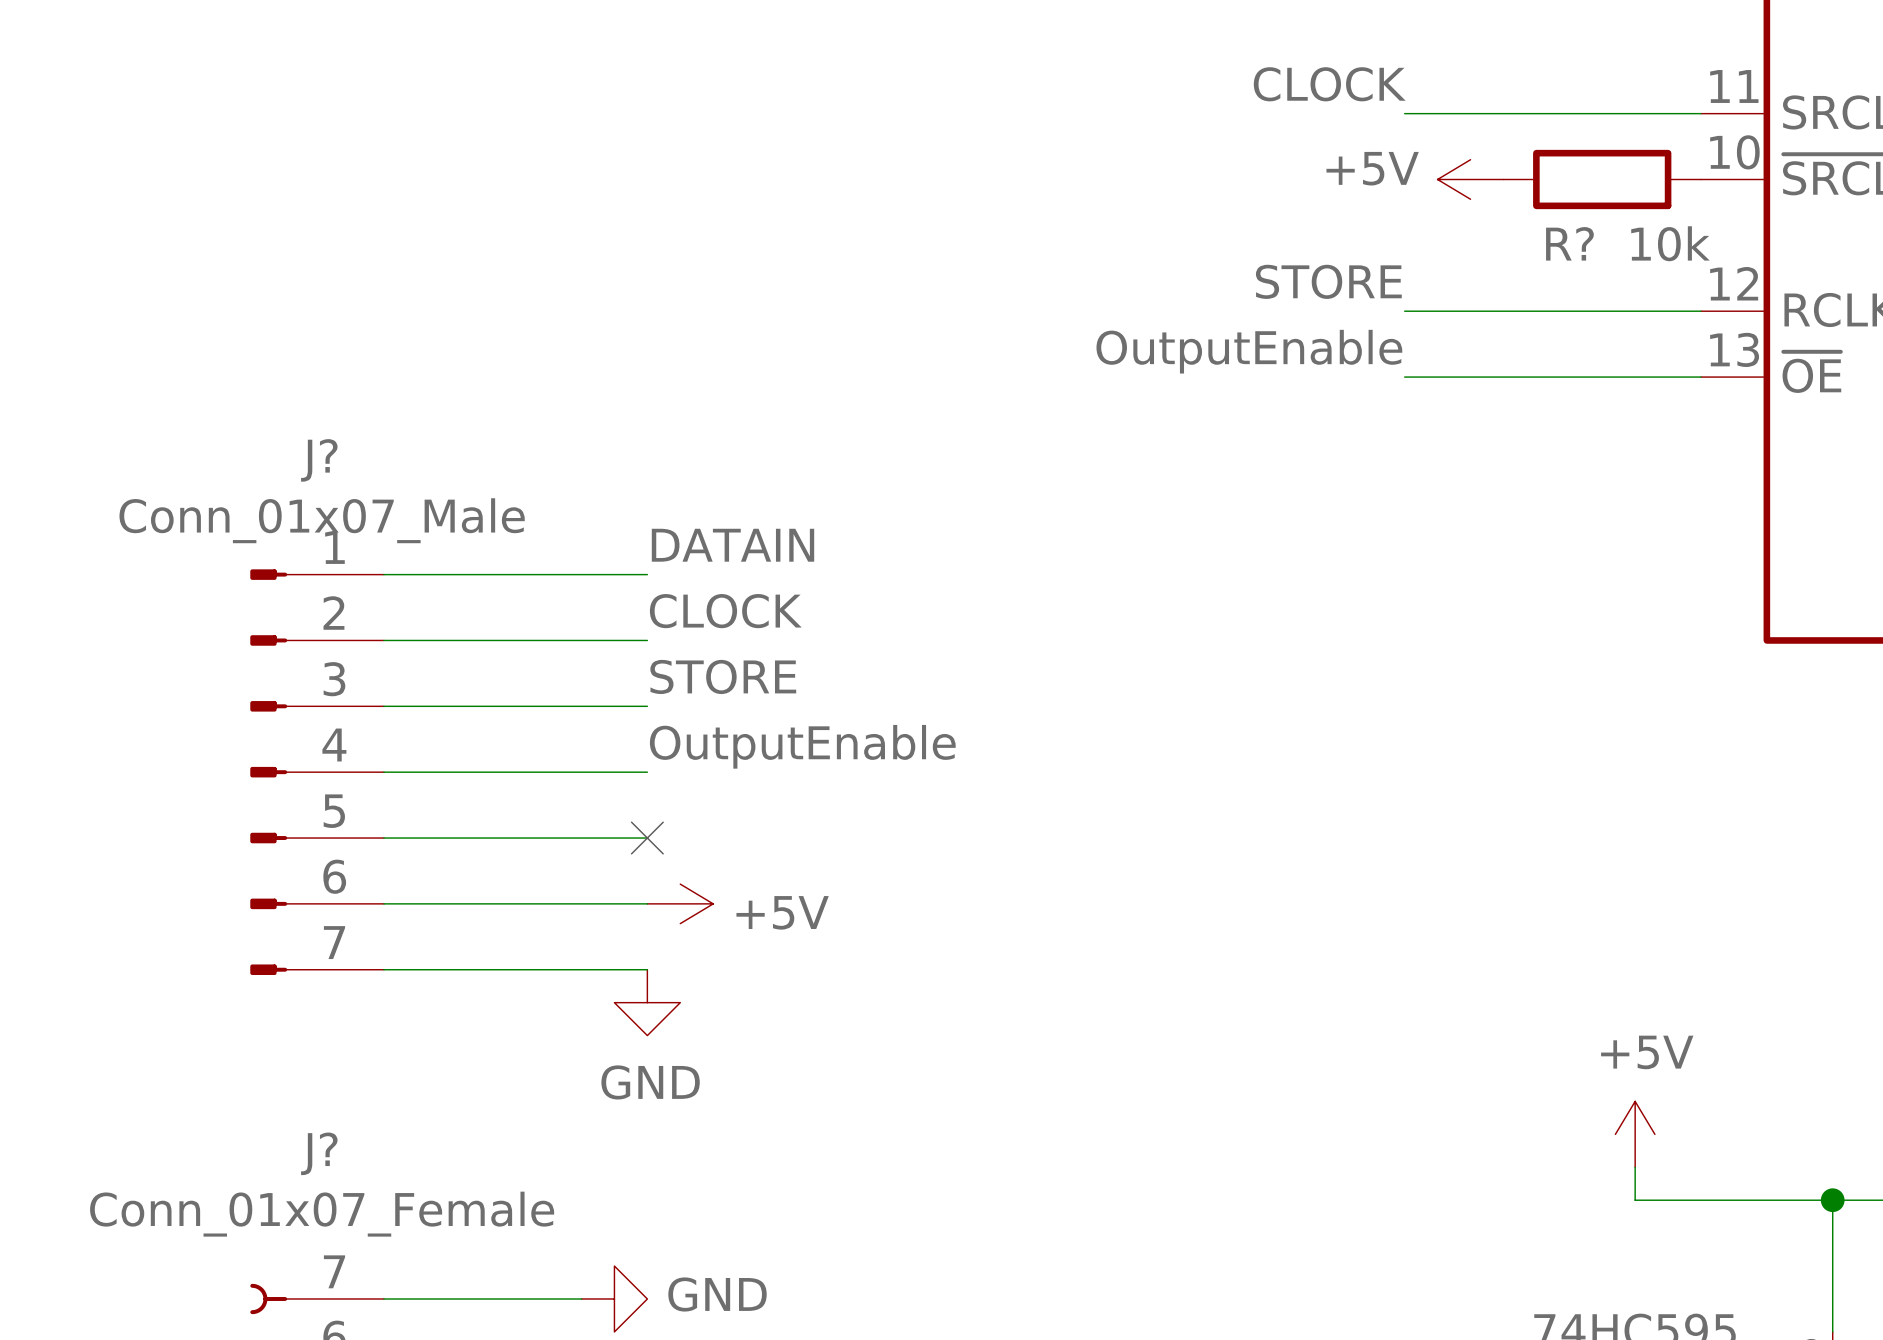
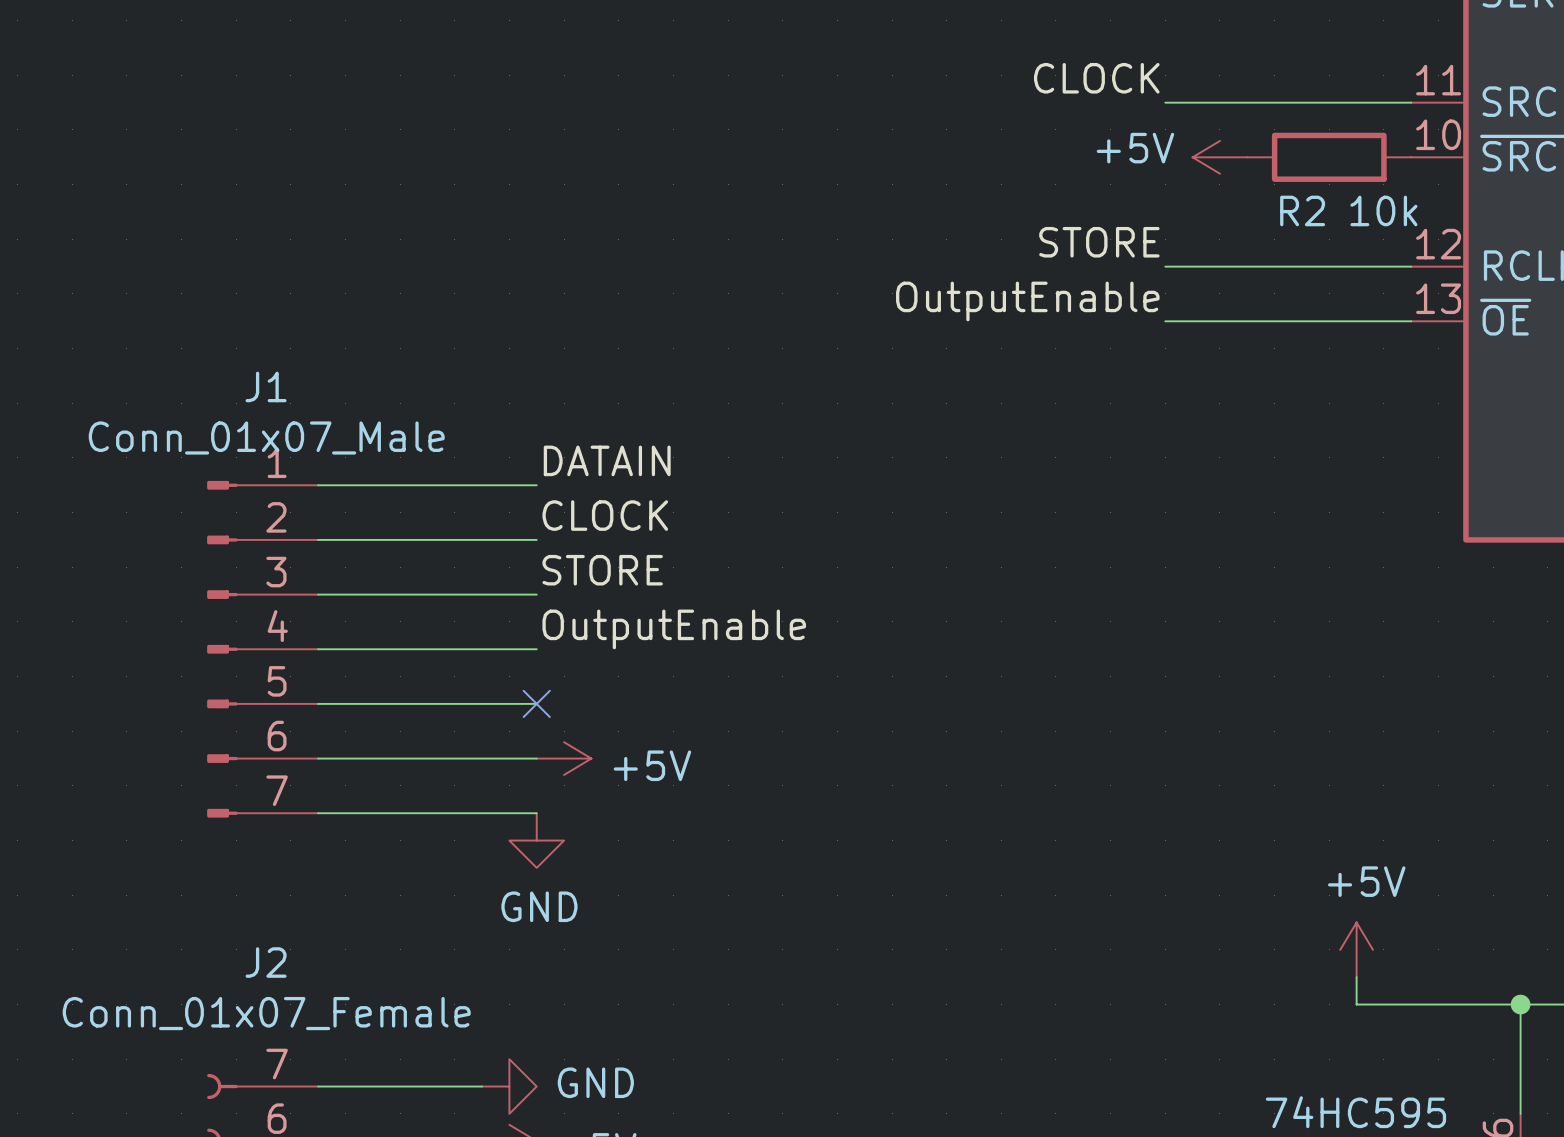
R? name: R? (1569, 243) -> R2 (1302, 210)
J? name: J? (319, 460) -> J1 (266, 386)
J? name: J? (319, 1153) -> J2 (266, 962)

